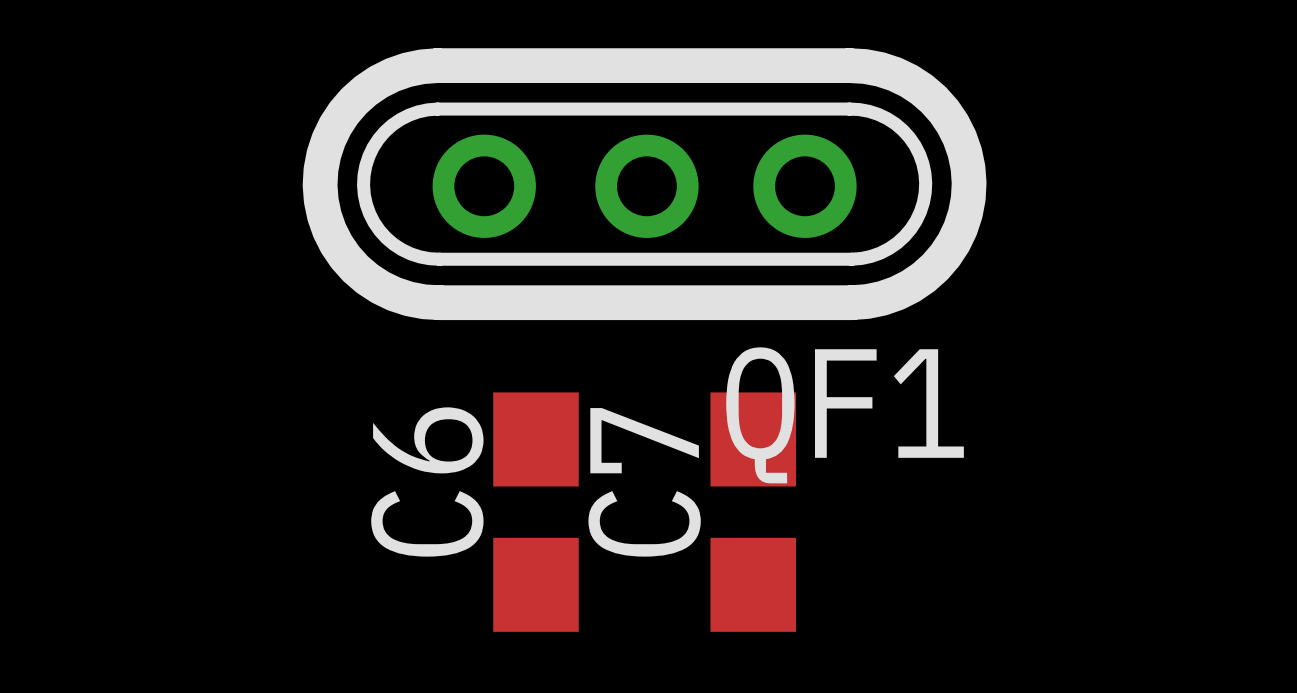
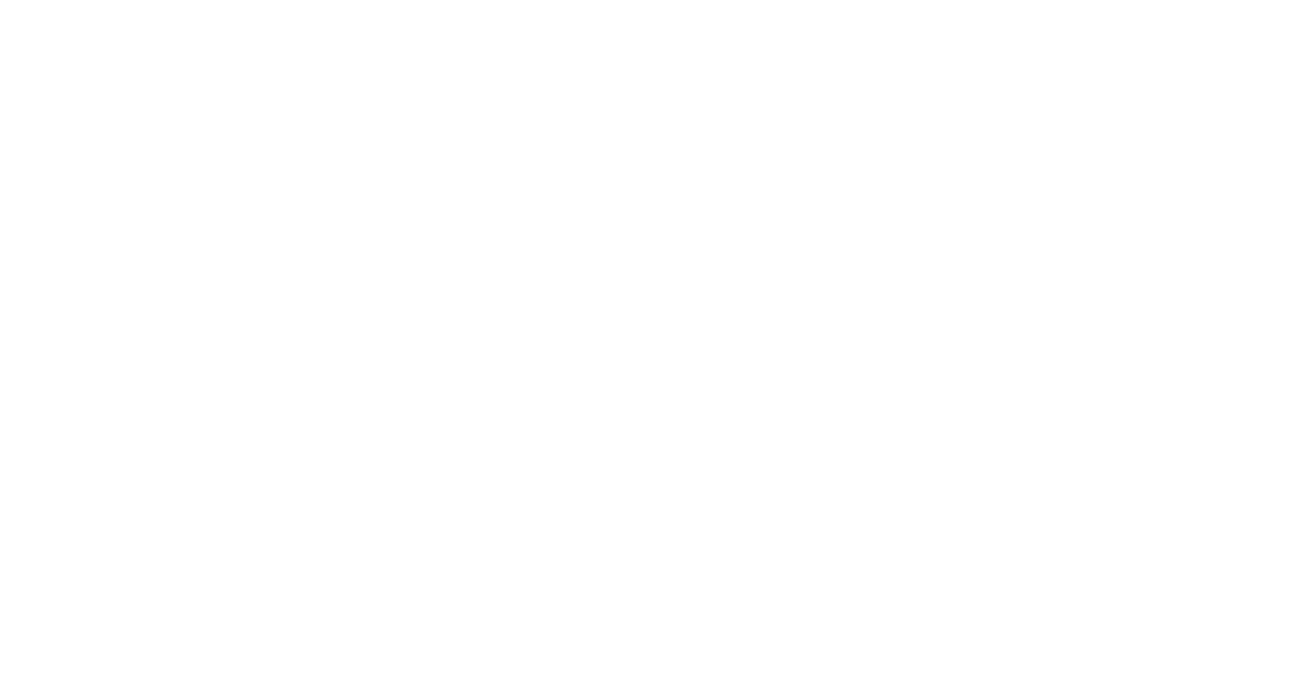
QF1: (644, 184) -> none
C6: (536, 512) -> none
C7: (753, 512) -> none

